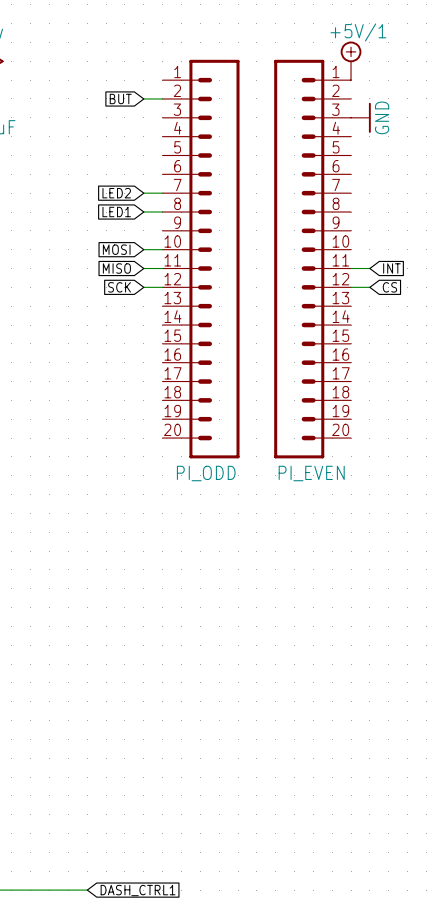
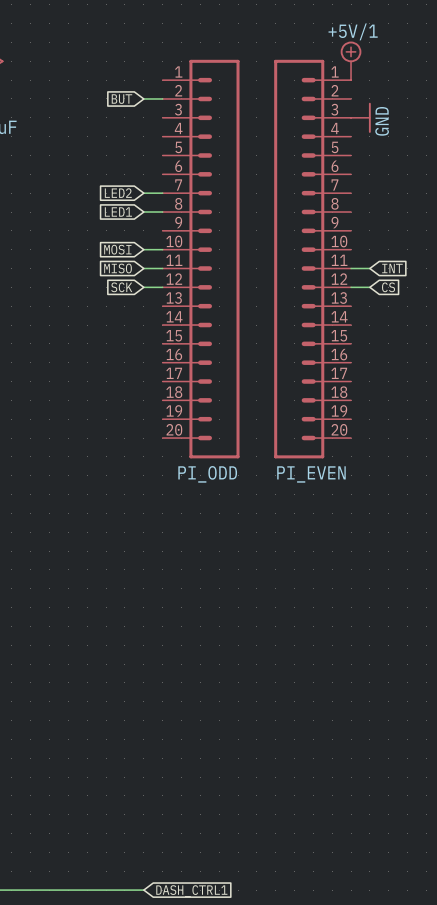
wire: none -> (87, 890) (143, 890)
global label position: DASH_CTRL1 (138, 890) -> DASH_CTRL1 (191, 891)

